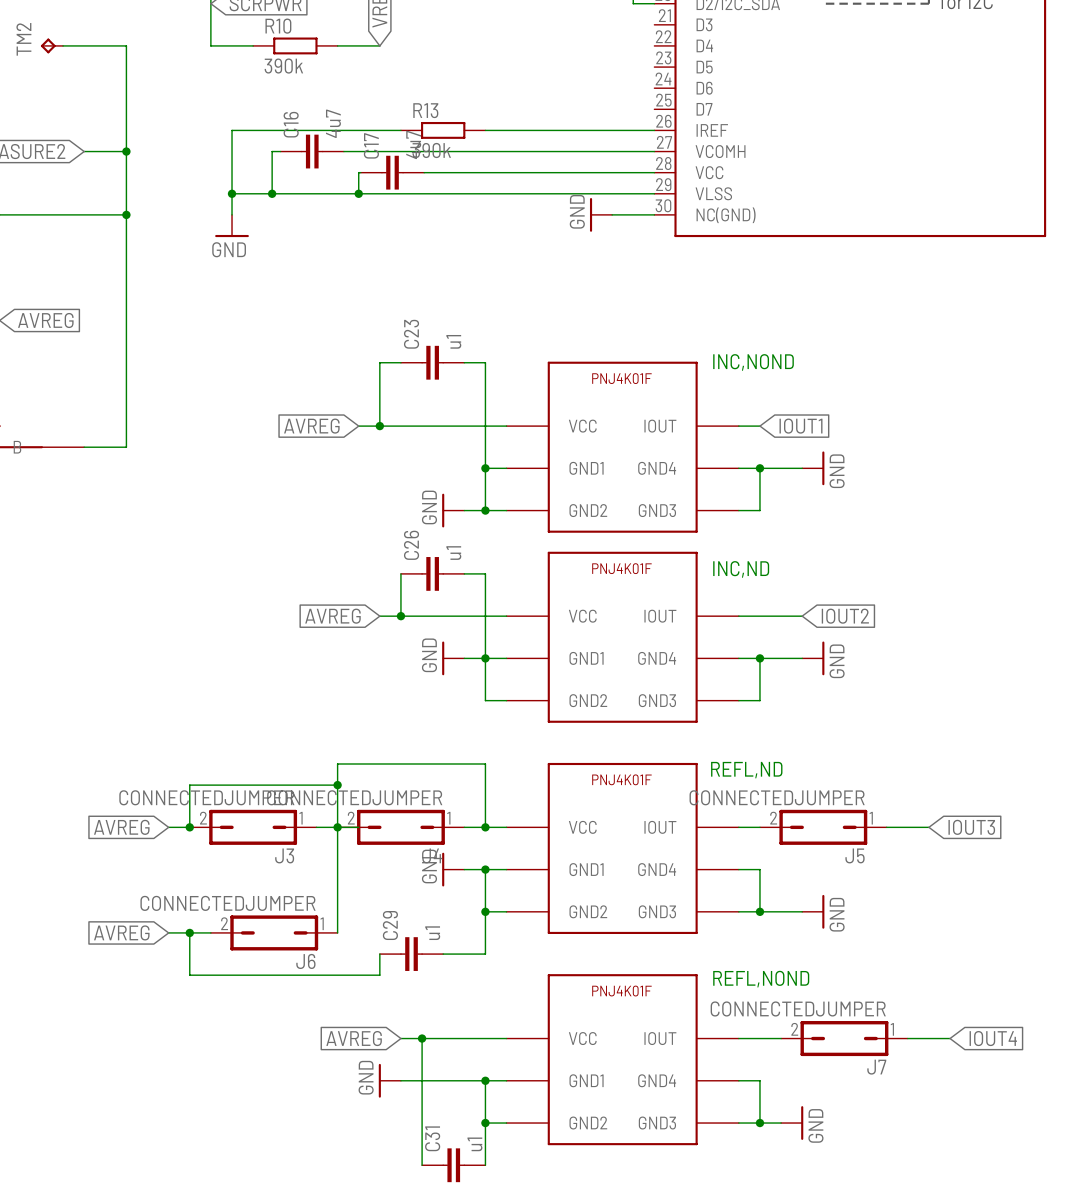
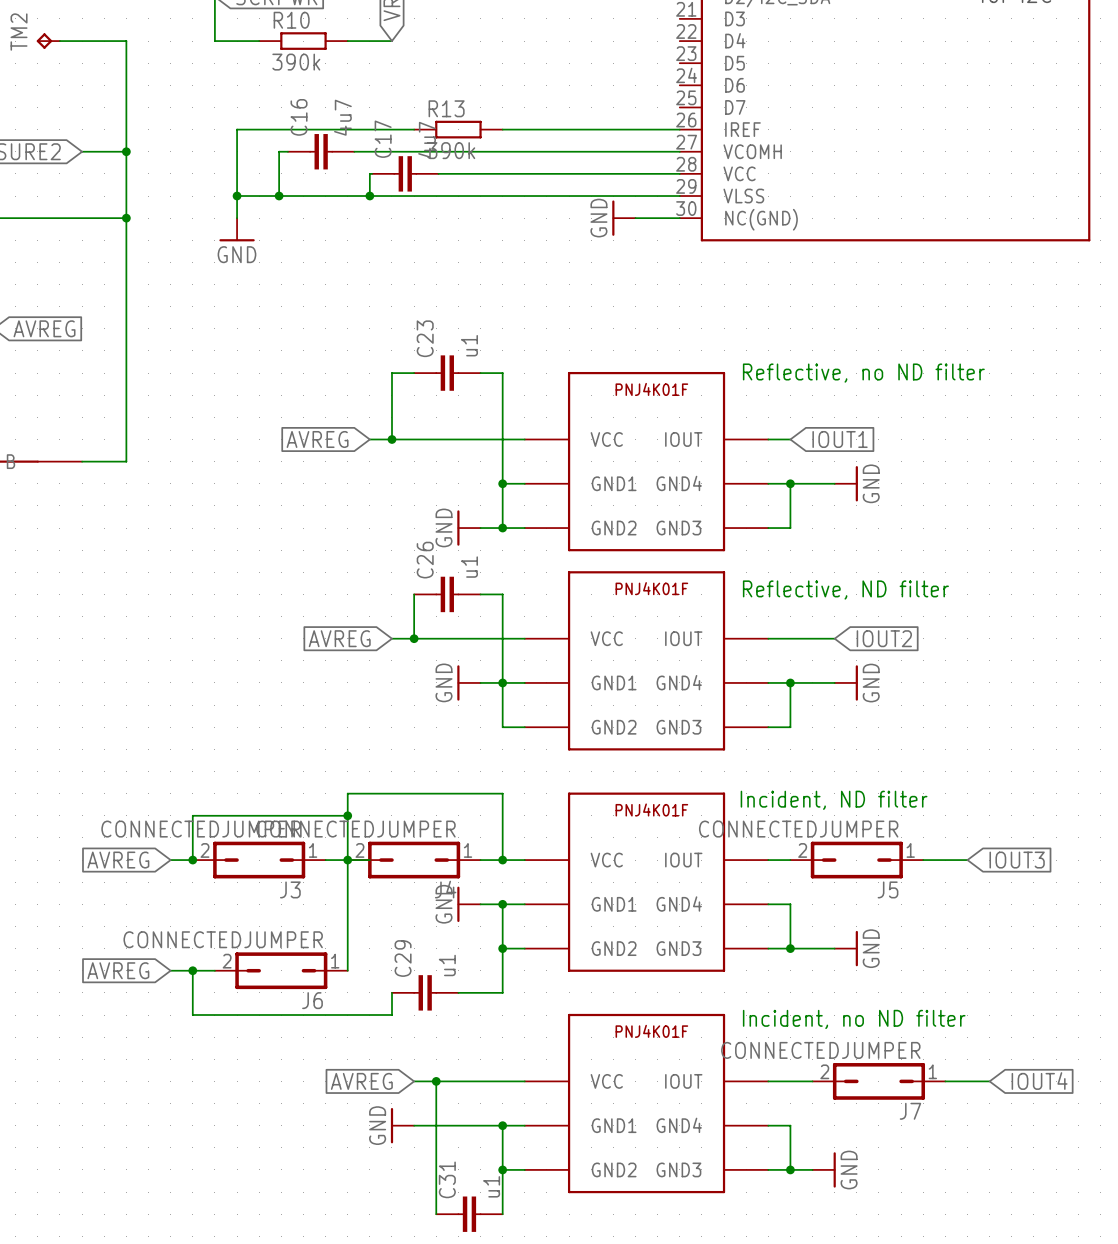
text: INC,NOND (753, 362) -> Reflective, no ND filter (863, 373)
text: INC,ND (741, 569) -> Reflective, ND filter (845, 590)
text: REFL,ND (746, 770) -> Incident, ND filter (834, 800)
text: REFL,NOND (761, 979) -> Incident, no ND filter (854, 1019)

